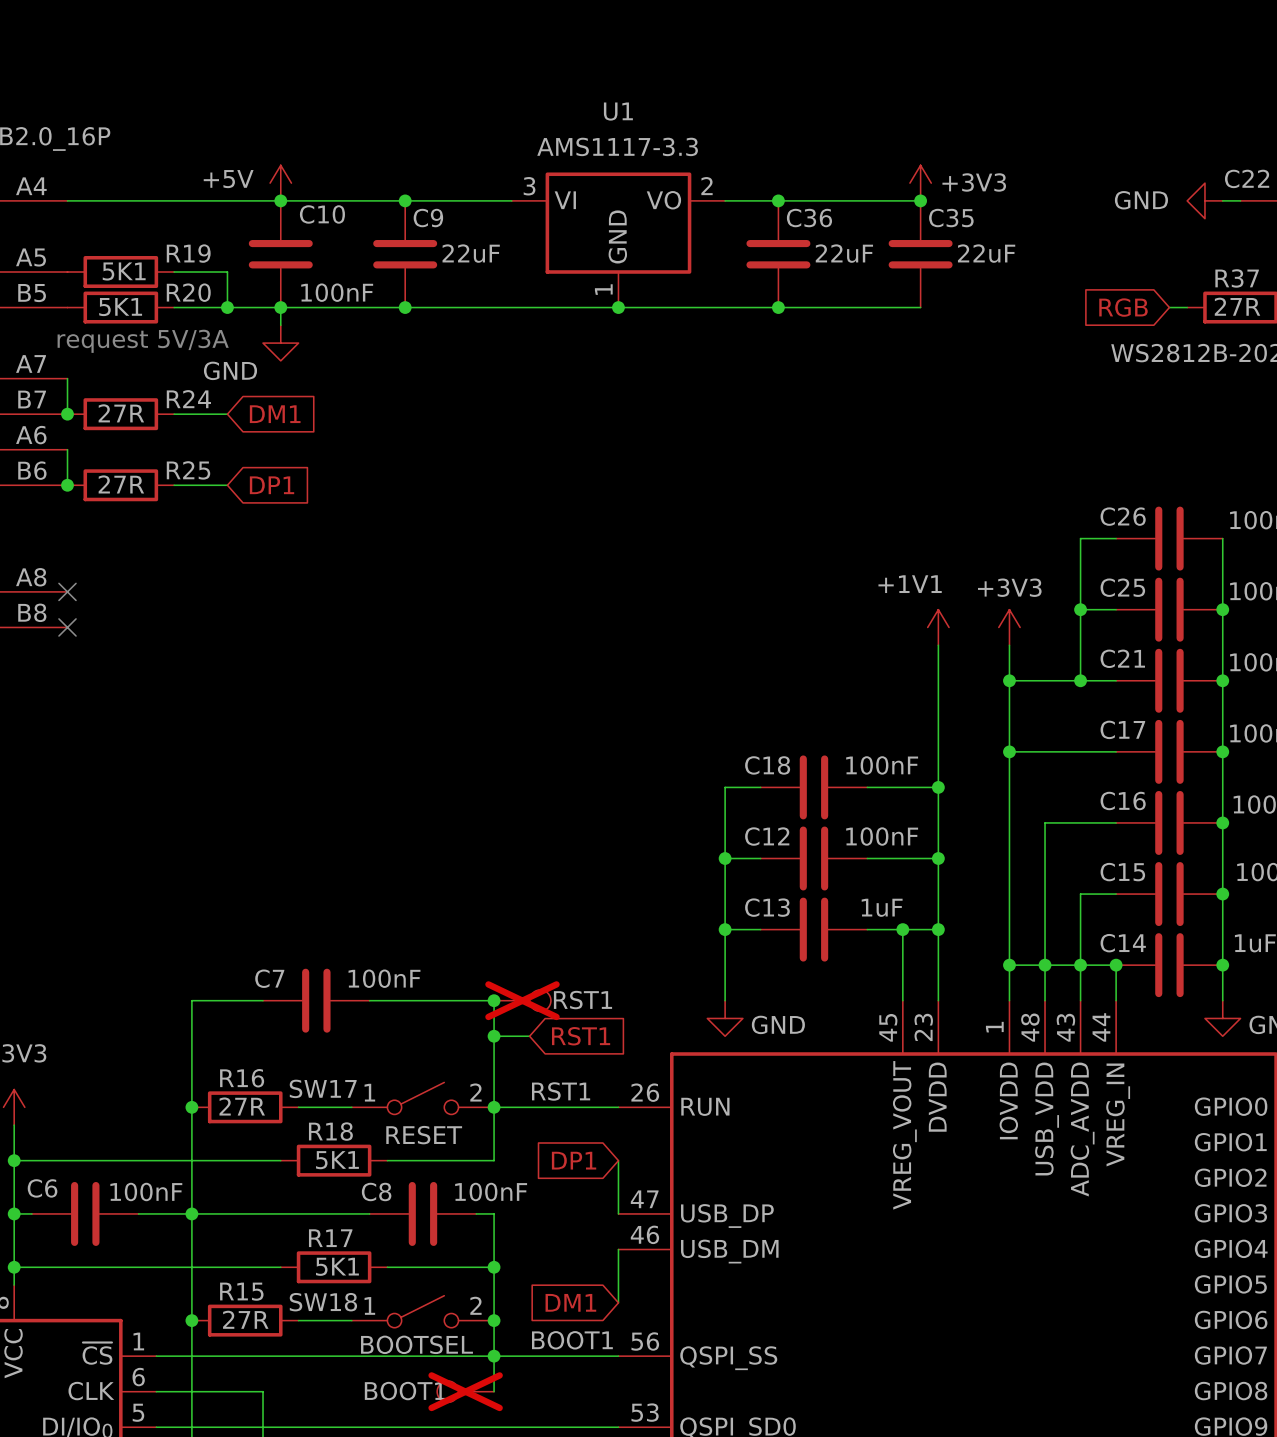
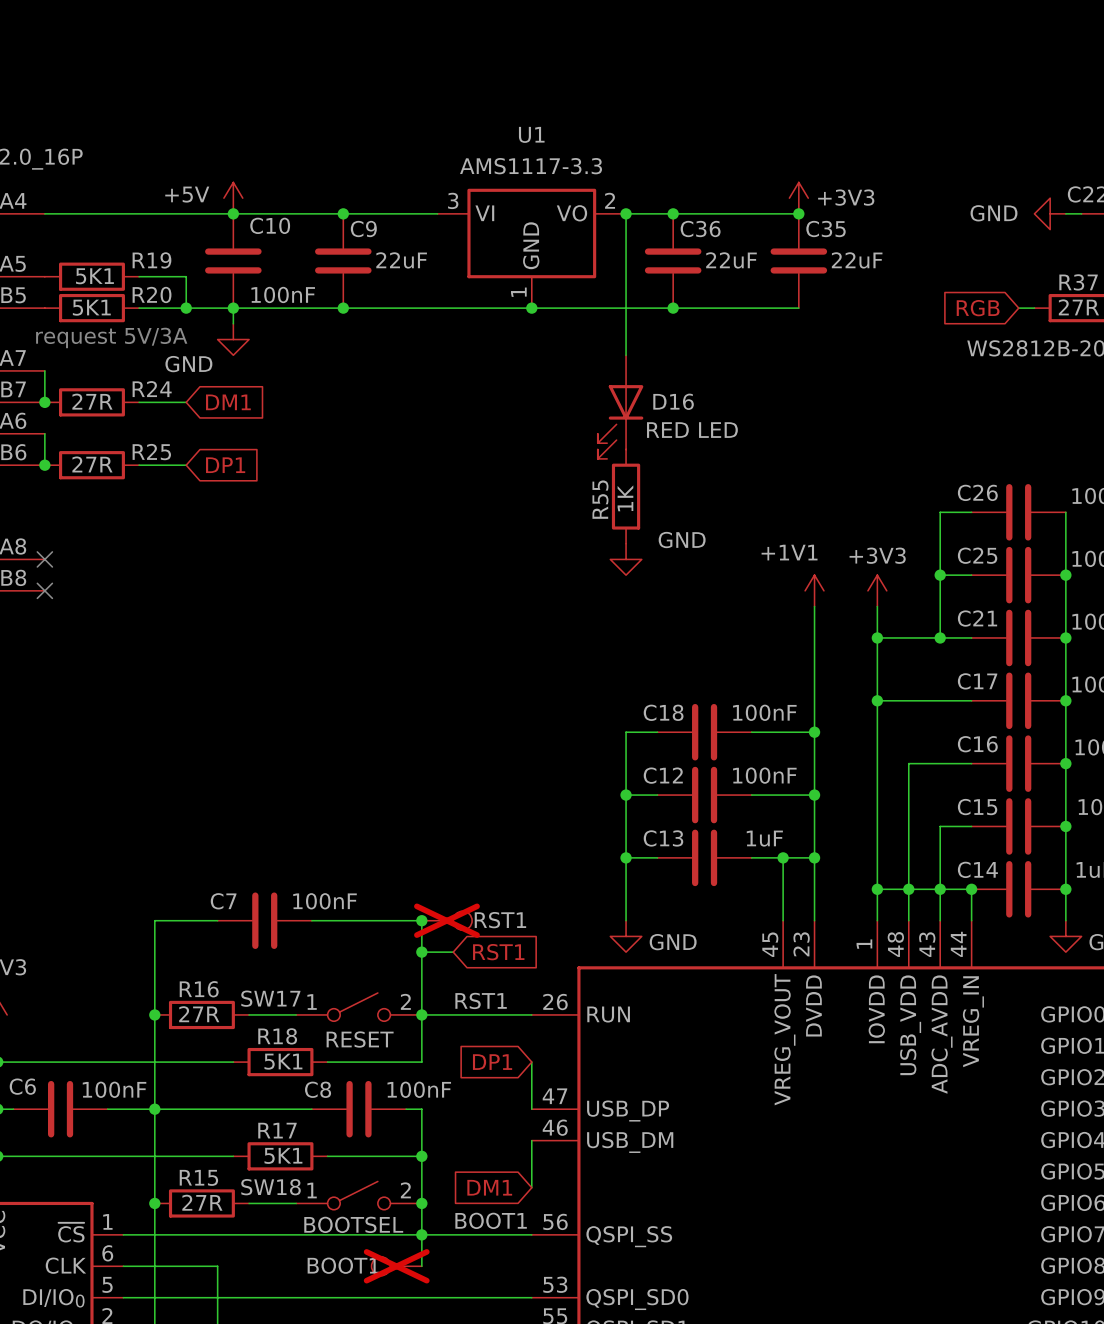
wire: none -> (626, 213) (626, 355)
junction: none -> (626, 213)
D16: none -> RED LED (620, 407)
R55: none -> 1K (626, 496)
power symbol: none -> GND (626, 559)

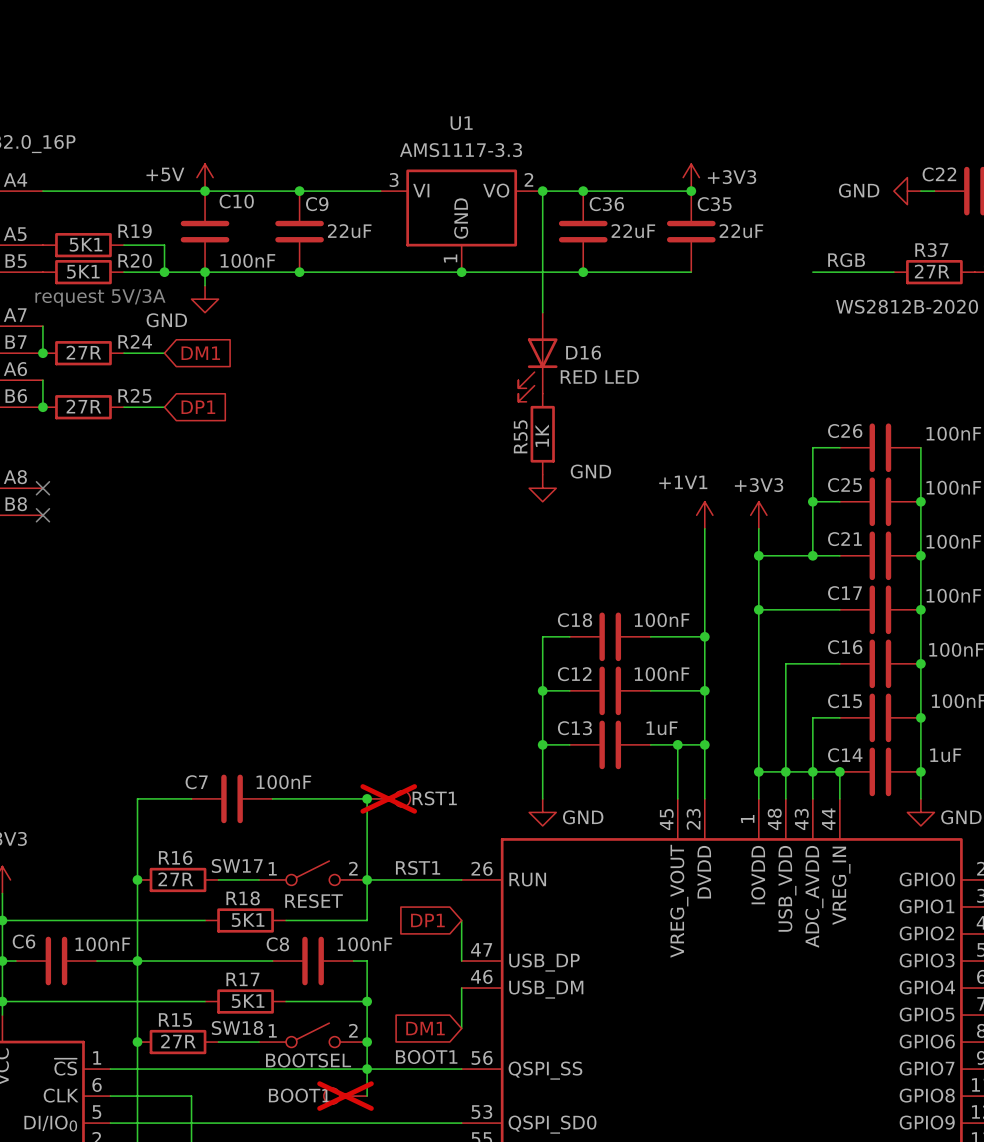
label: none -> RGB (846, 260)
wire: none -> (812, 272) (880, 272)
global label: RGB (978, 308) -> none
wire: (421, 952) (453, 952) -> none
junction: (421, 952) -> none
global label: RST1 (498, 952) -> none

